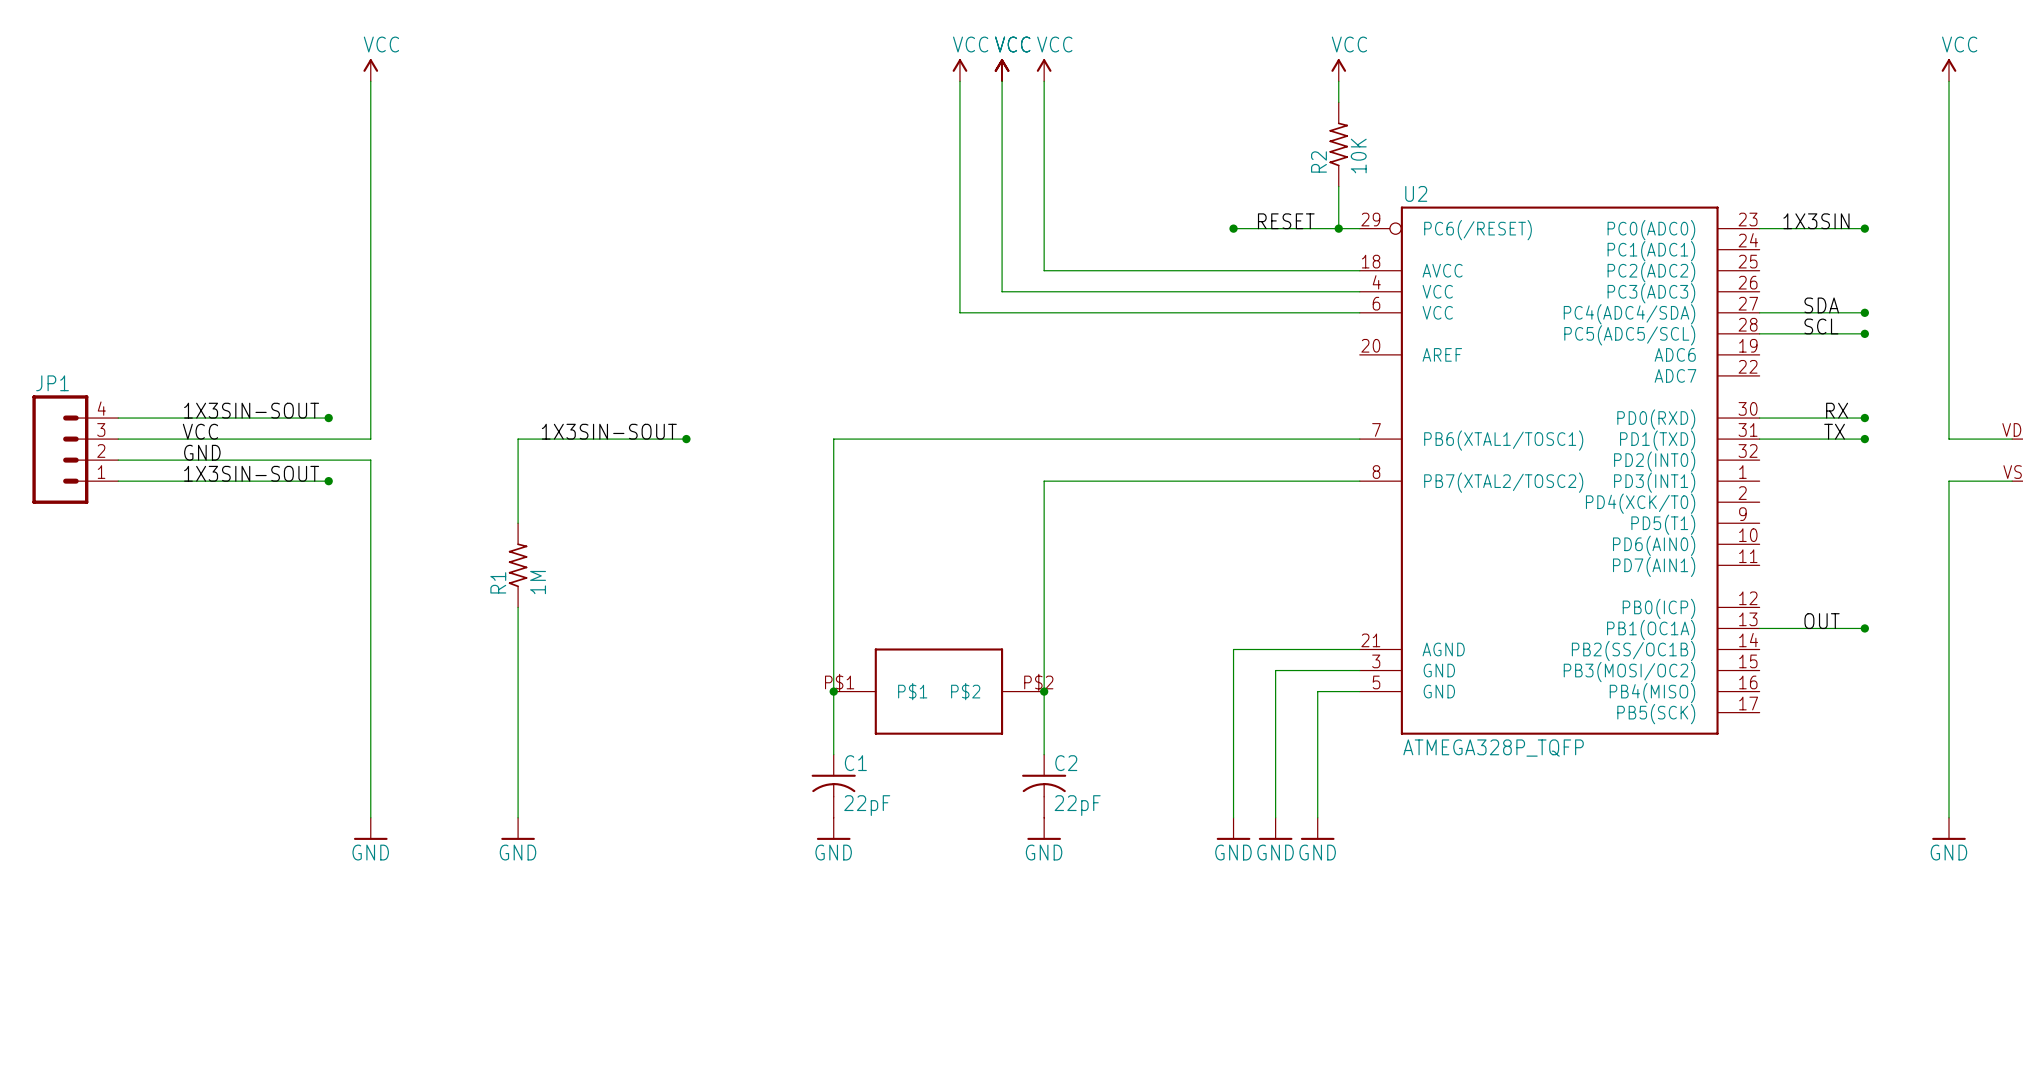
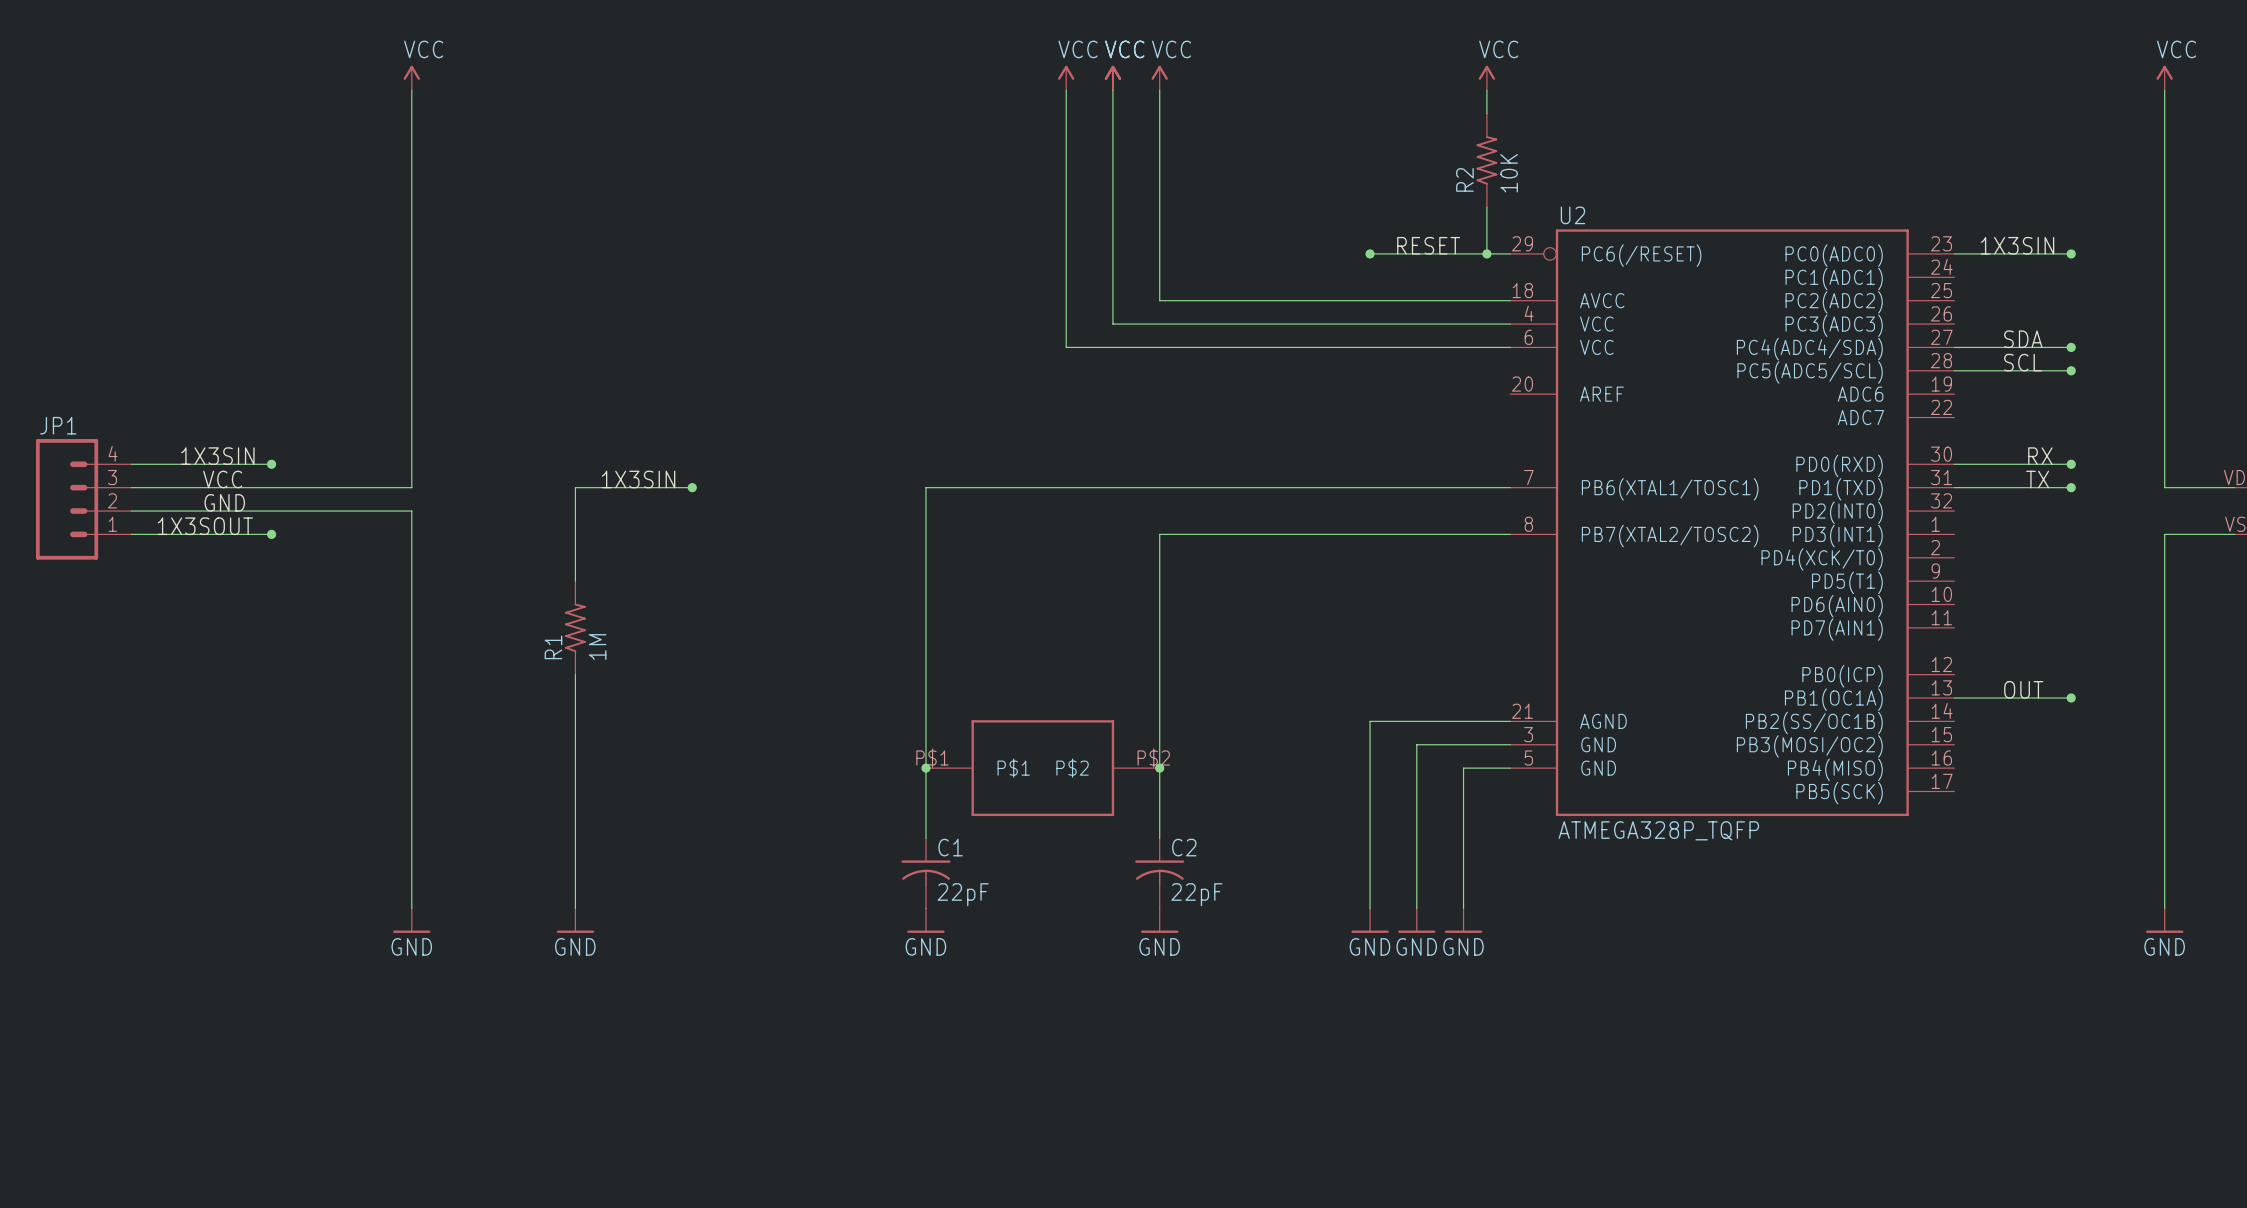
label: 1X3SIN-SOUT (251, 410) -> 1X3SIN (217, 456)
wire: (244, 418) (328, 418) -> none
junction: none -> (271, 464)
junction: (328, 418) -> none
label: 1X3SIN-SOUT (609, 431) -> 1X3SIN (638, 479)
wire: (623, 439) (686, 439) -> none
junction: none -> (692, 487)
junction: (686, 439) -> none
label: 1X3SIN-SOUT (251, 473) -> 1X3SOUT (205, 526)
wire: (244, 481) (328, 481) -> none
junction: none -> (271, 534)
junction: (328, 481) -> none

